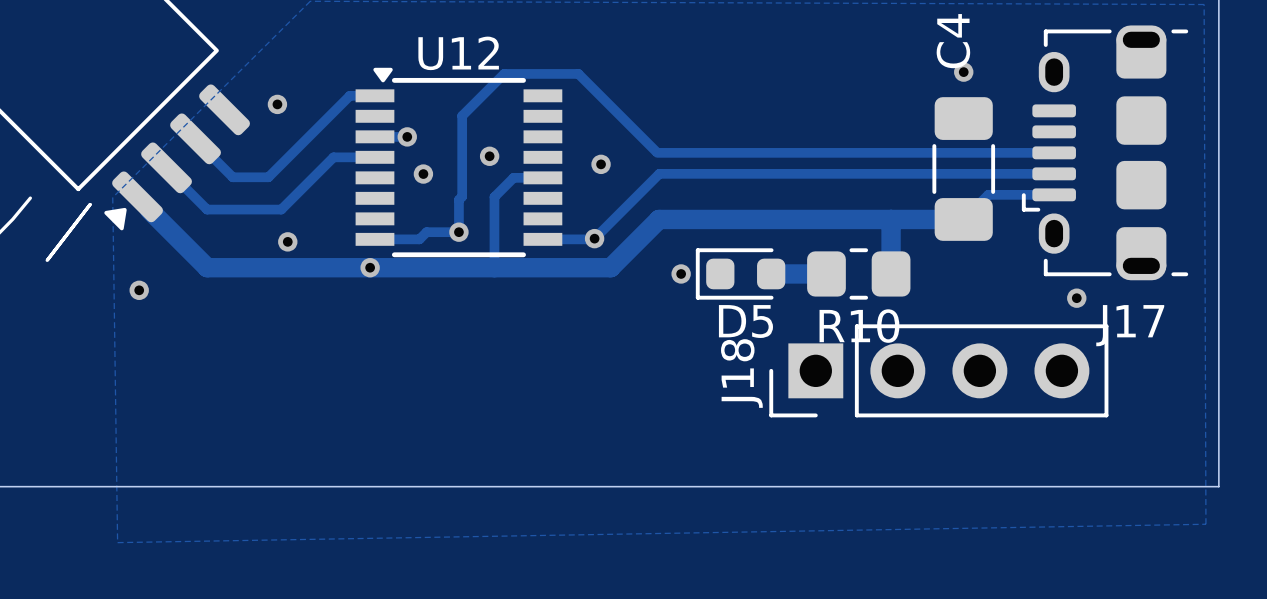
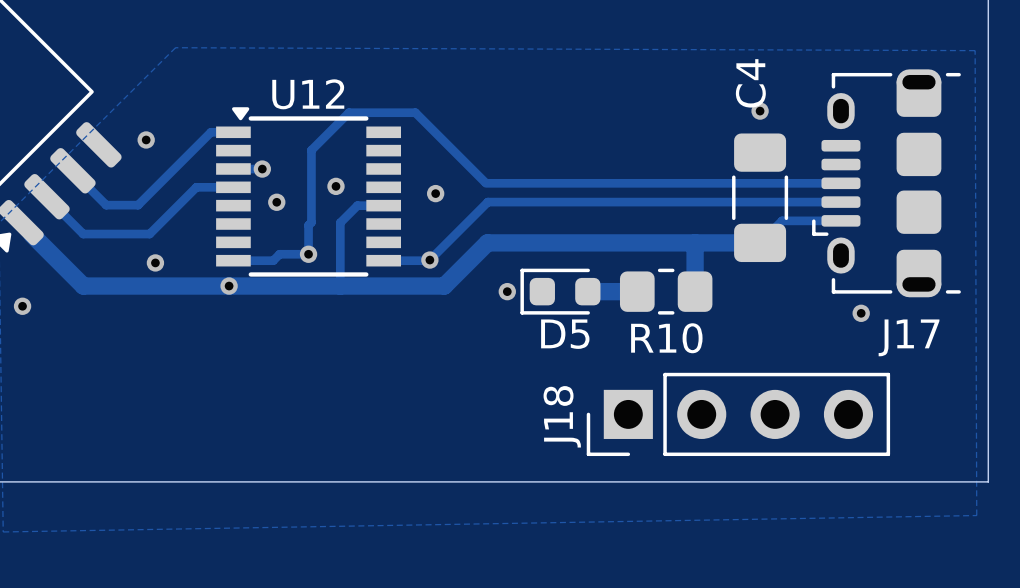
J18 position: (938, 370) -> (738, 414)

